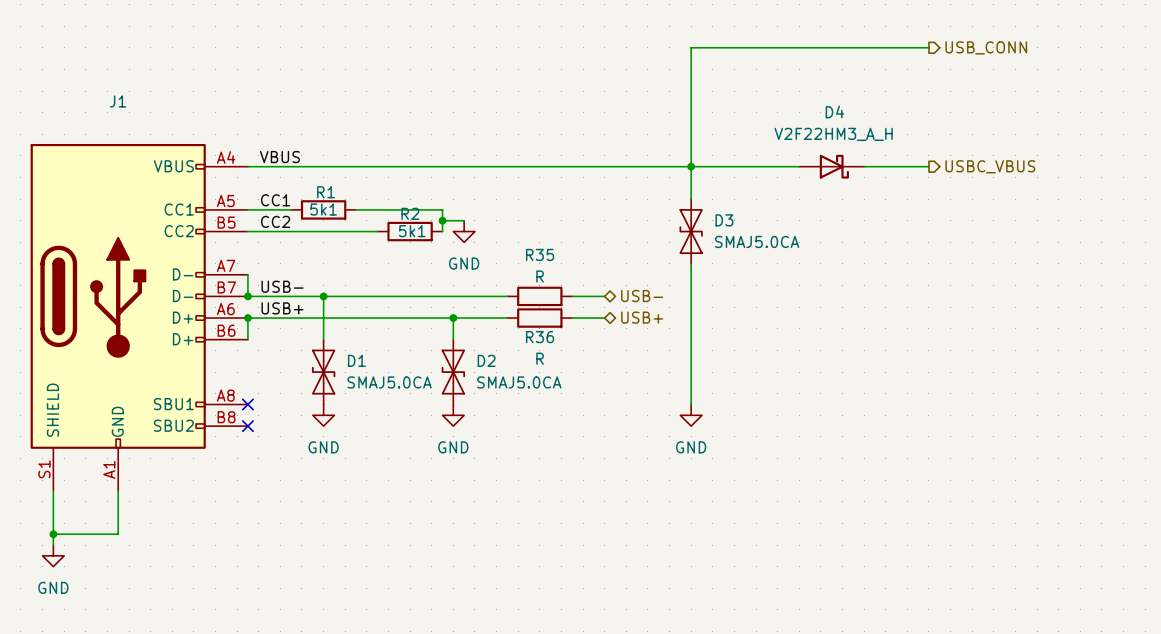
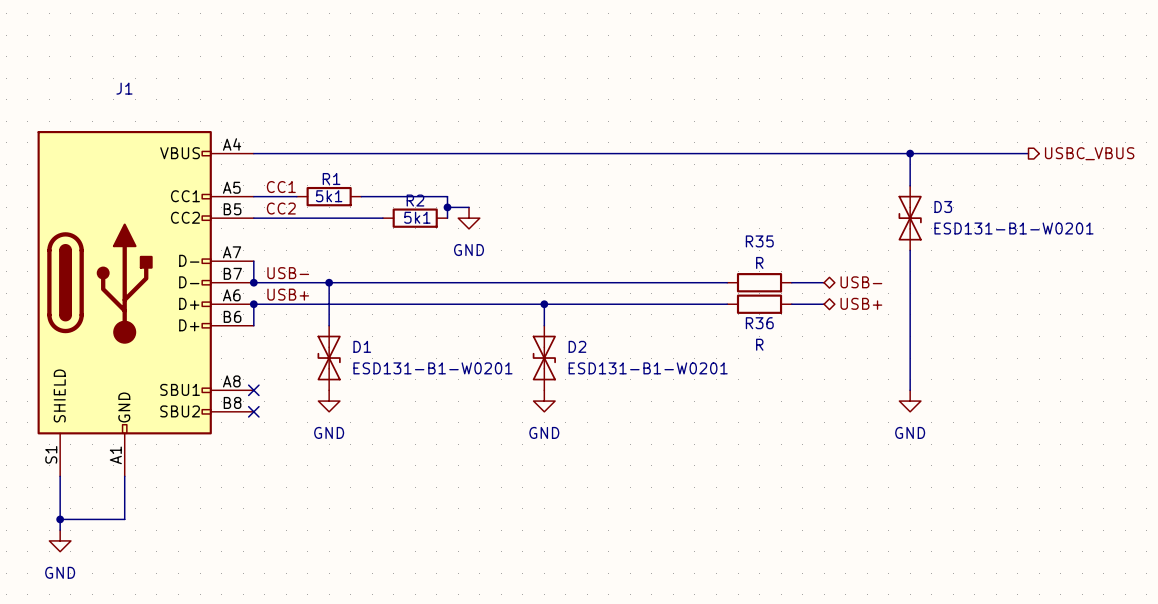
wire: (928, 47) (691, 47) (691, 199) -> none
hierarchical label: USB_CONN (986, 47) -> none
label: VBUS (279, 157) -> none
junction: (691, 166) -> none
D4: V2F22HM3_A_H (831, 166) -> none
wire: none -> (910, 153) (910, 185)
junction: none -> (910, 153)
wire: none -> (931, 153) (1028, 153)
hierarchical label position: USBC_VBUS (990, 166) -> USBC_VBUS (1089, 153)
D3 position: (691, 231) -> (910, 218)
D3 value: SMAJ5.0CA (757, 241) -> ESD131-B1-W0201 (1013, 228)
wire: (691, 263) (691, 404) -> none
wire: none -> (910, 250) (910, 390)
wire: none -> (512, 282) (576, 282)
R35 position: (539, 296) -> (759, 282)
wire: none -> (608, 282) (727, 282)
hierarchical label: USB- (642, 296) -> none
wire: none -> (791, 282) (824, 282)
hierarchical label: none -> USB- (861, 282)
hierarchical label: USB+ (642, 317) -> none
hierarchical label: none -> USB+ (861, 303)
wire: (453, 318) (453, 339) -> (544, 304) (544, 325)
junction: (453, 318) -> none
wire: none -> (512, 304) (576, 304)
junction: none -> (544, 304)
R36 position: (539, 318) -> (759, 304)
wire: none -> (608, 304) (727, 304)
wire: none -> (791, 304) (824, 304)
D2 position: (453, 372) -> (544, 358)
D1 value: SMAJ5.0CA (389, 382) -> ESD131-B1-W0201 (432, 368)
D2 value: SMAJ5.0CA (519, 382) -> ESD131-B1-W0201 (648, 368)
power symbol: GND (453, 415) -> none
power symbol: none -> GND (544, 401)
power symbol: GND (691, 415) -> none
power symbol: none -> GND (910, 401)

